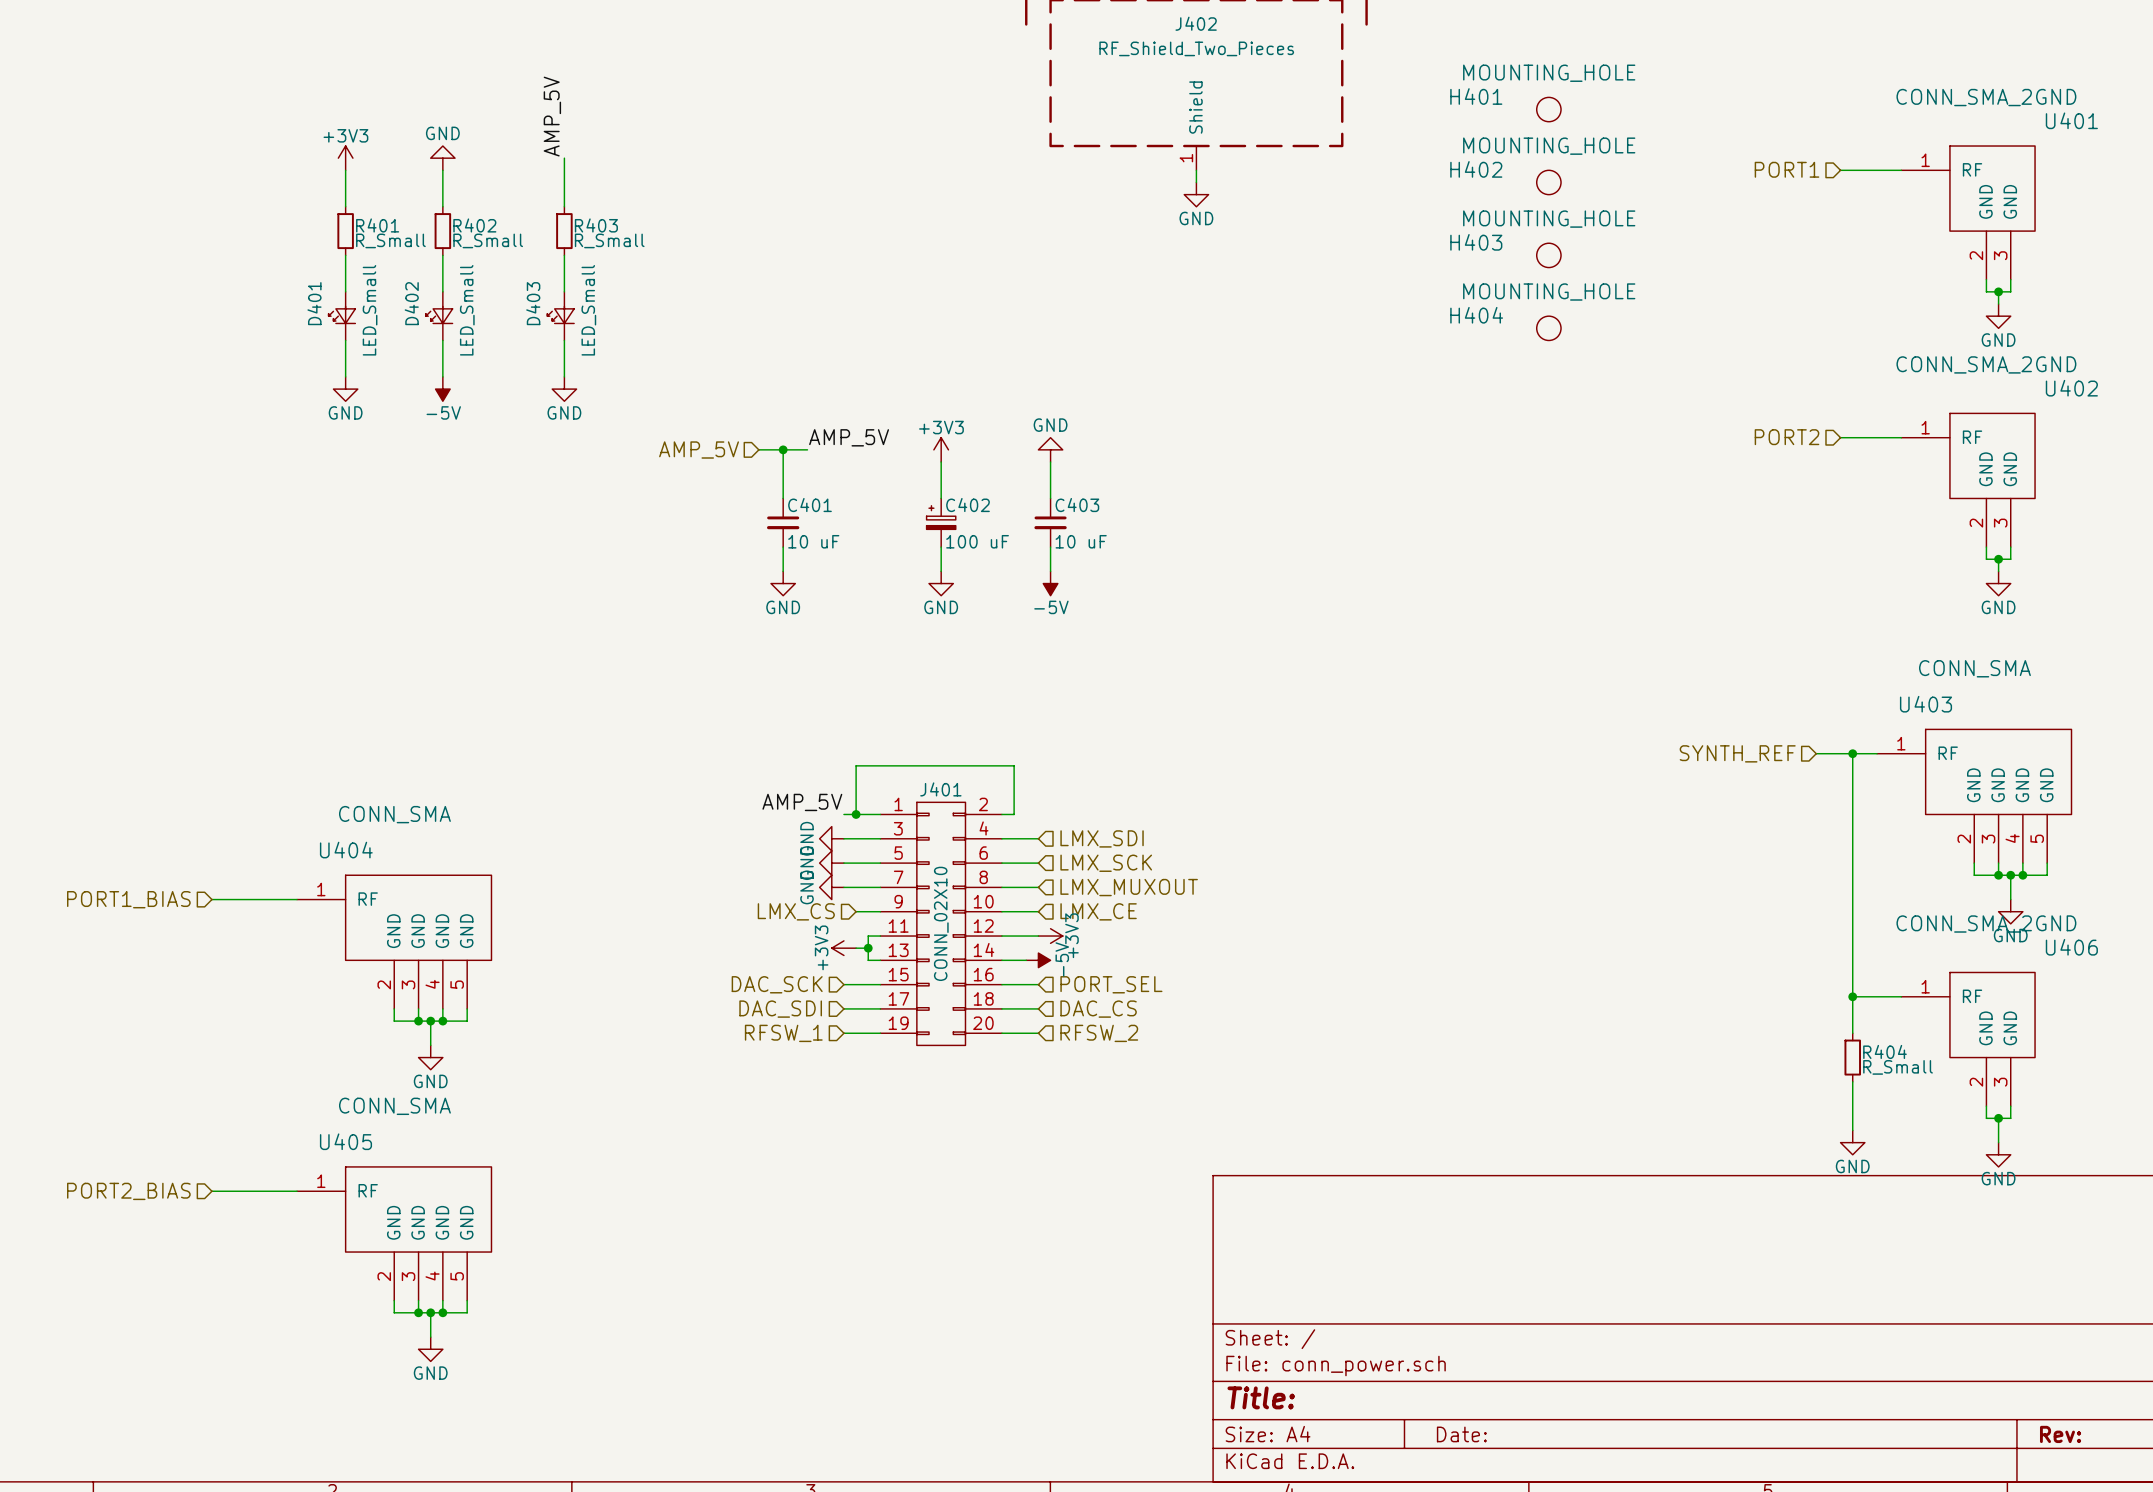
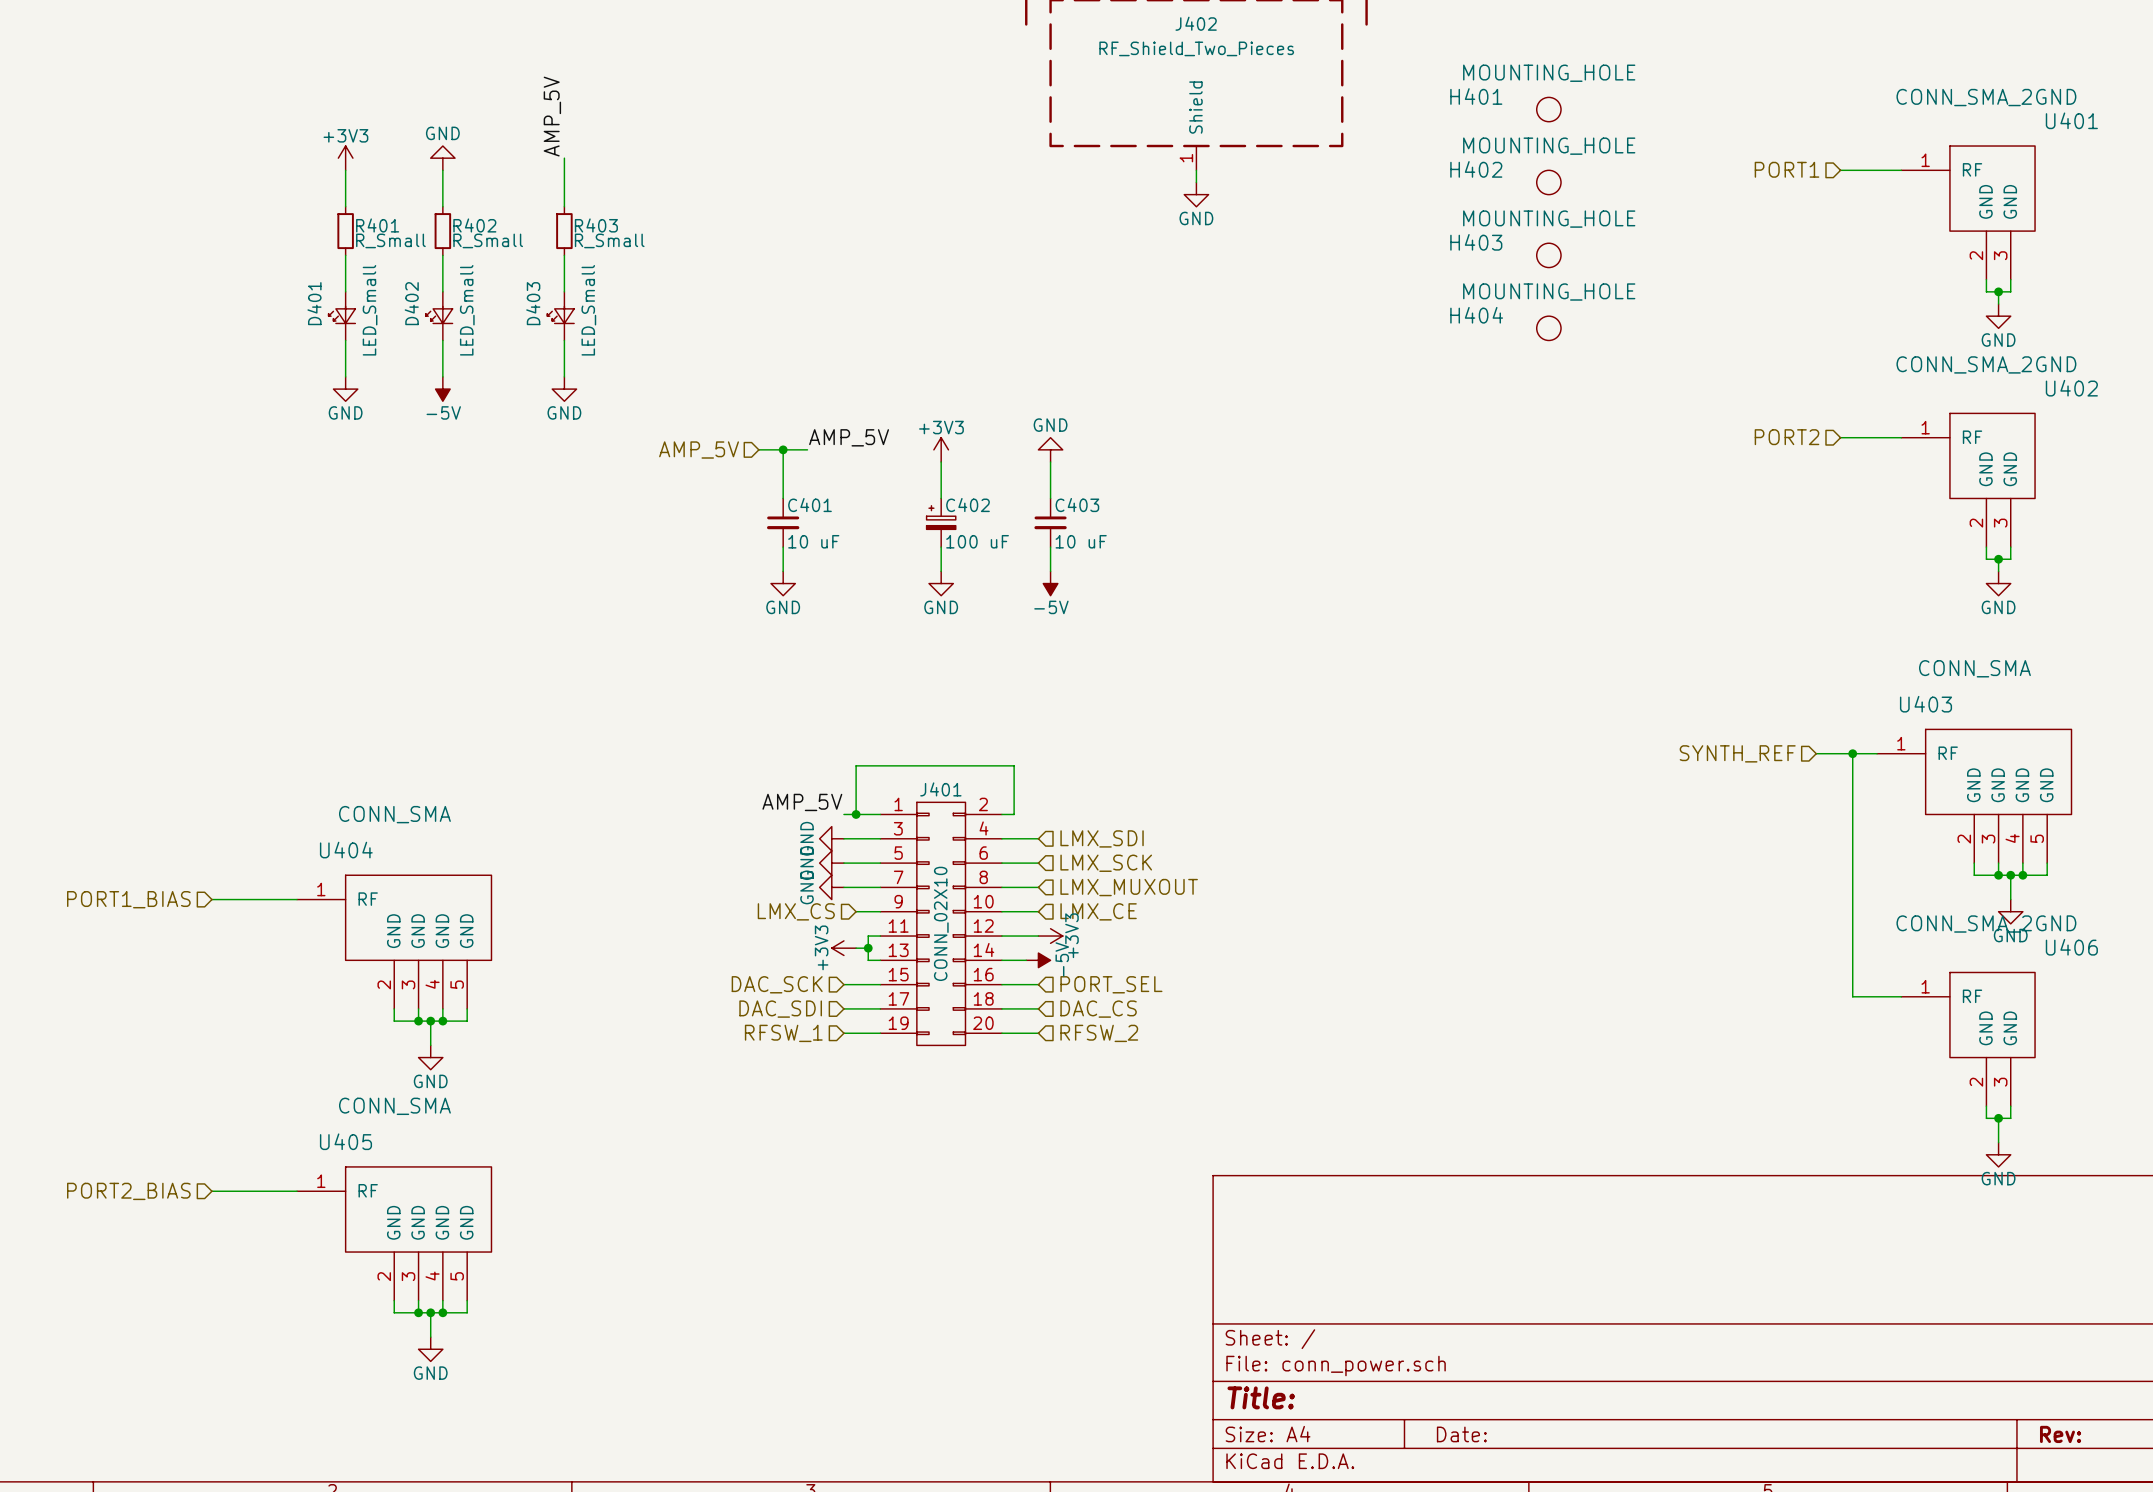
wire: (1852, 996) (1852, 1033) -> none
junction: (1852, 996) -> none
R404: R_Small (1852, 1057) -> none
wire: (1852, 1081) (1852, 1130) -> none
power symbol: GND (1852, 1142) -> none

